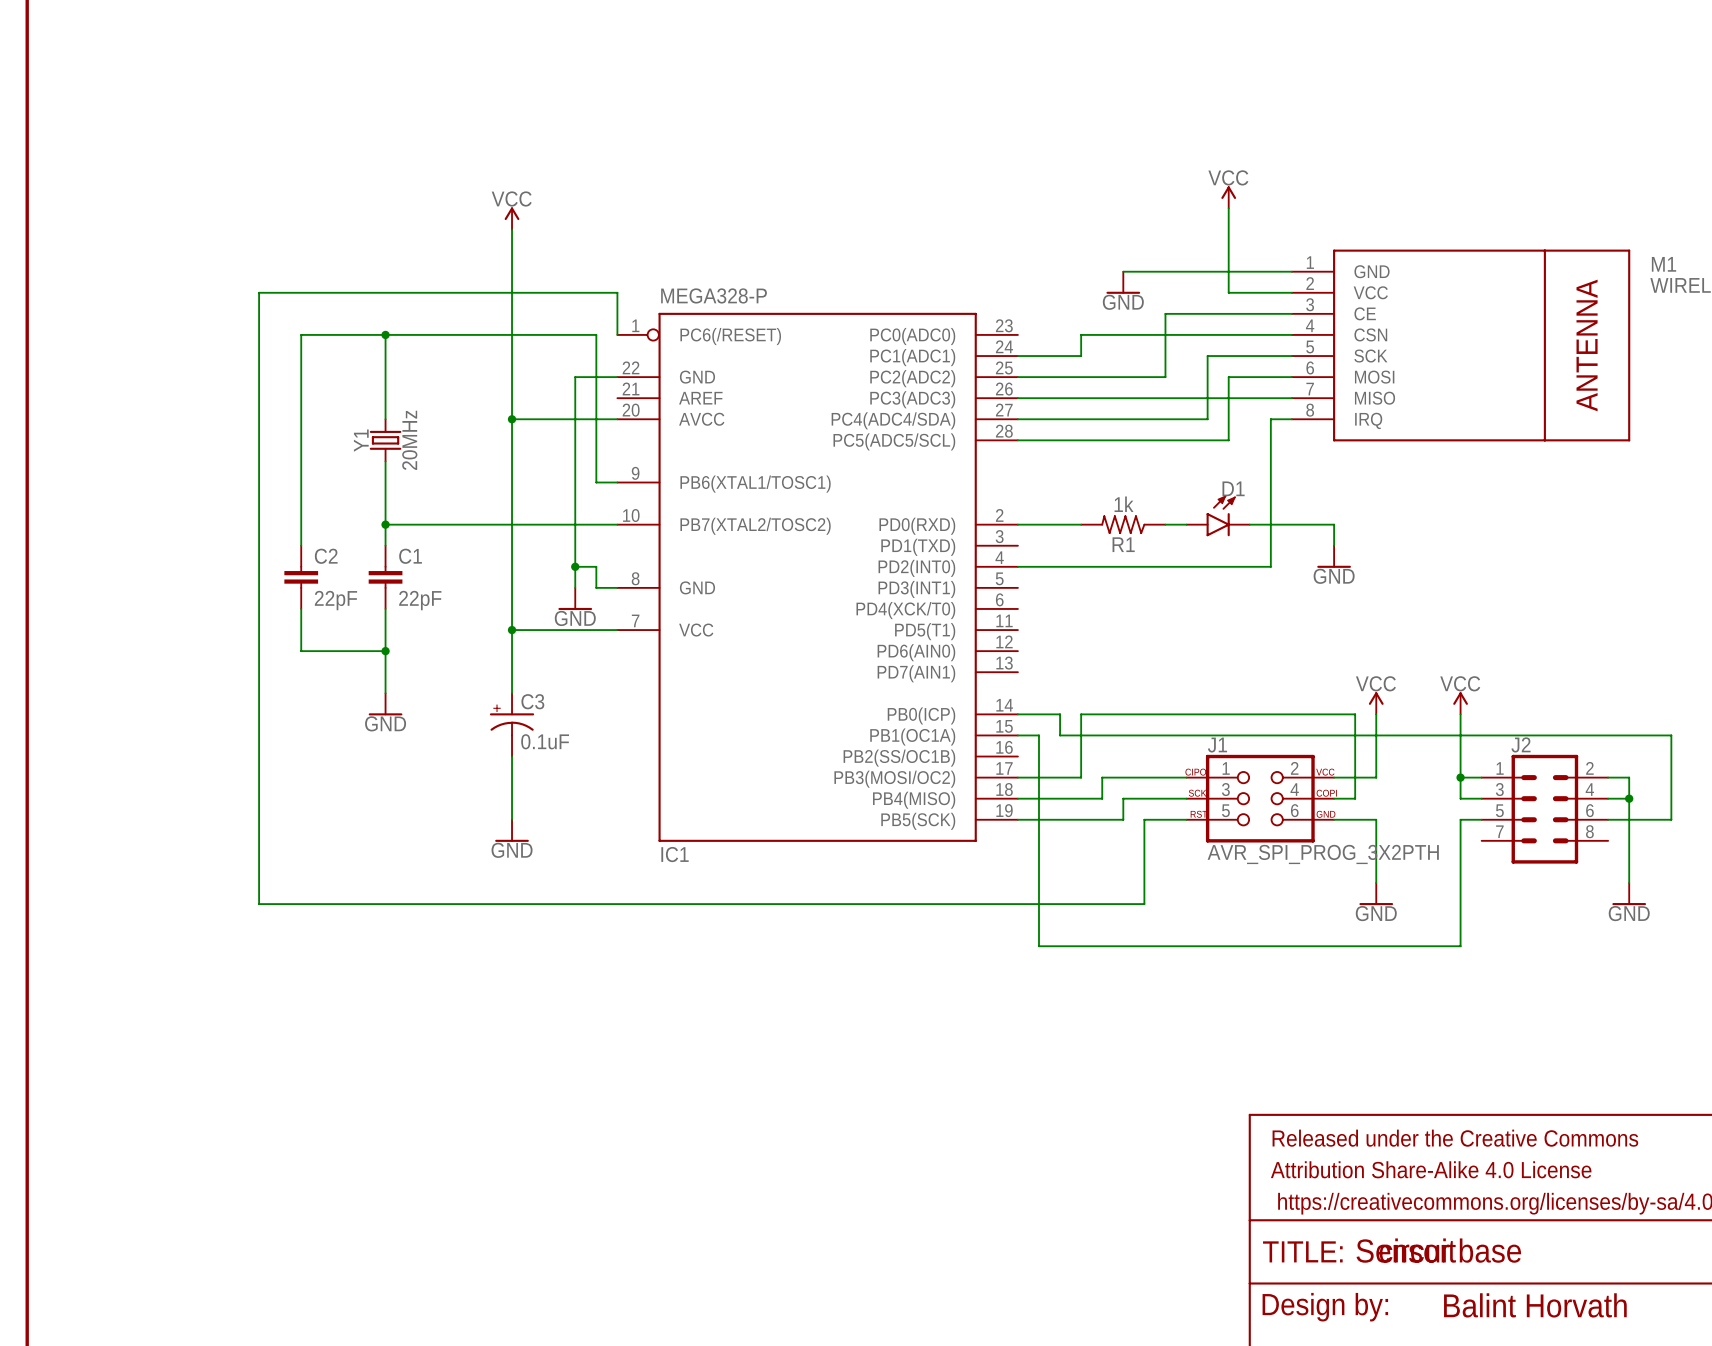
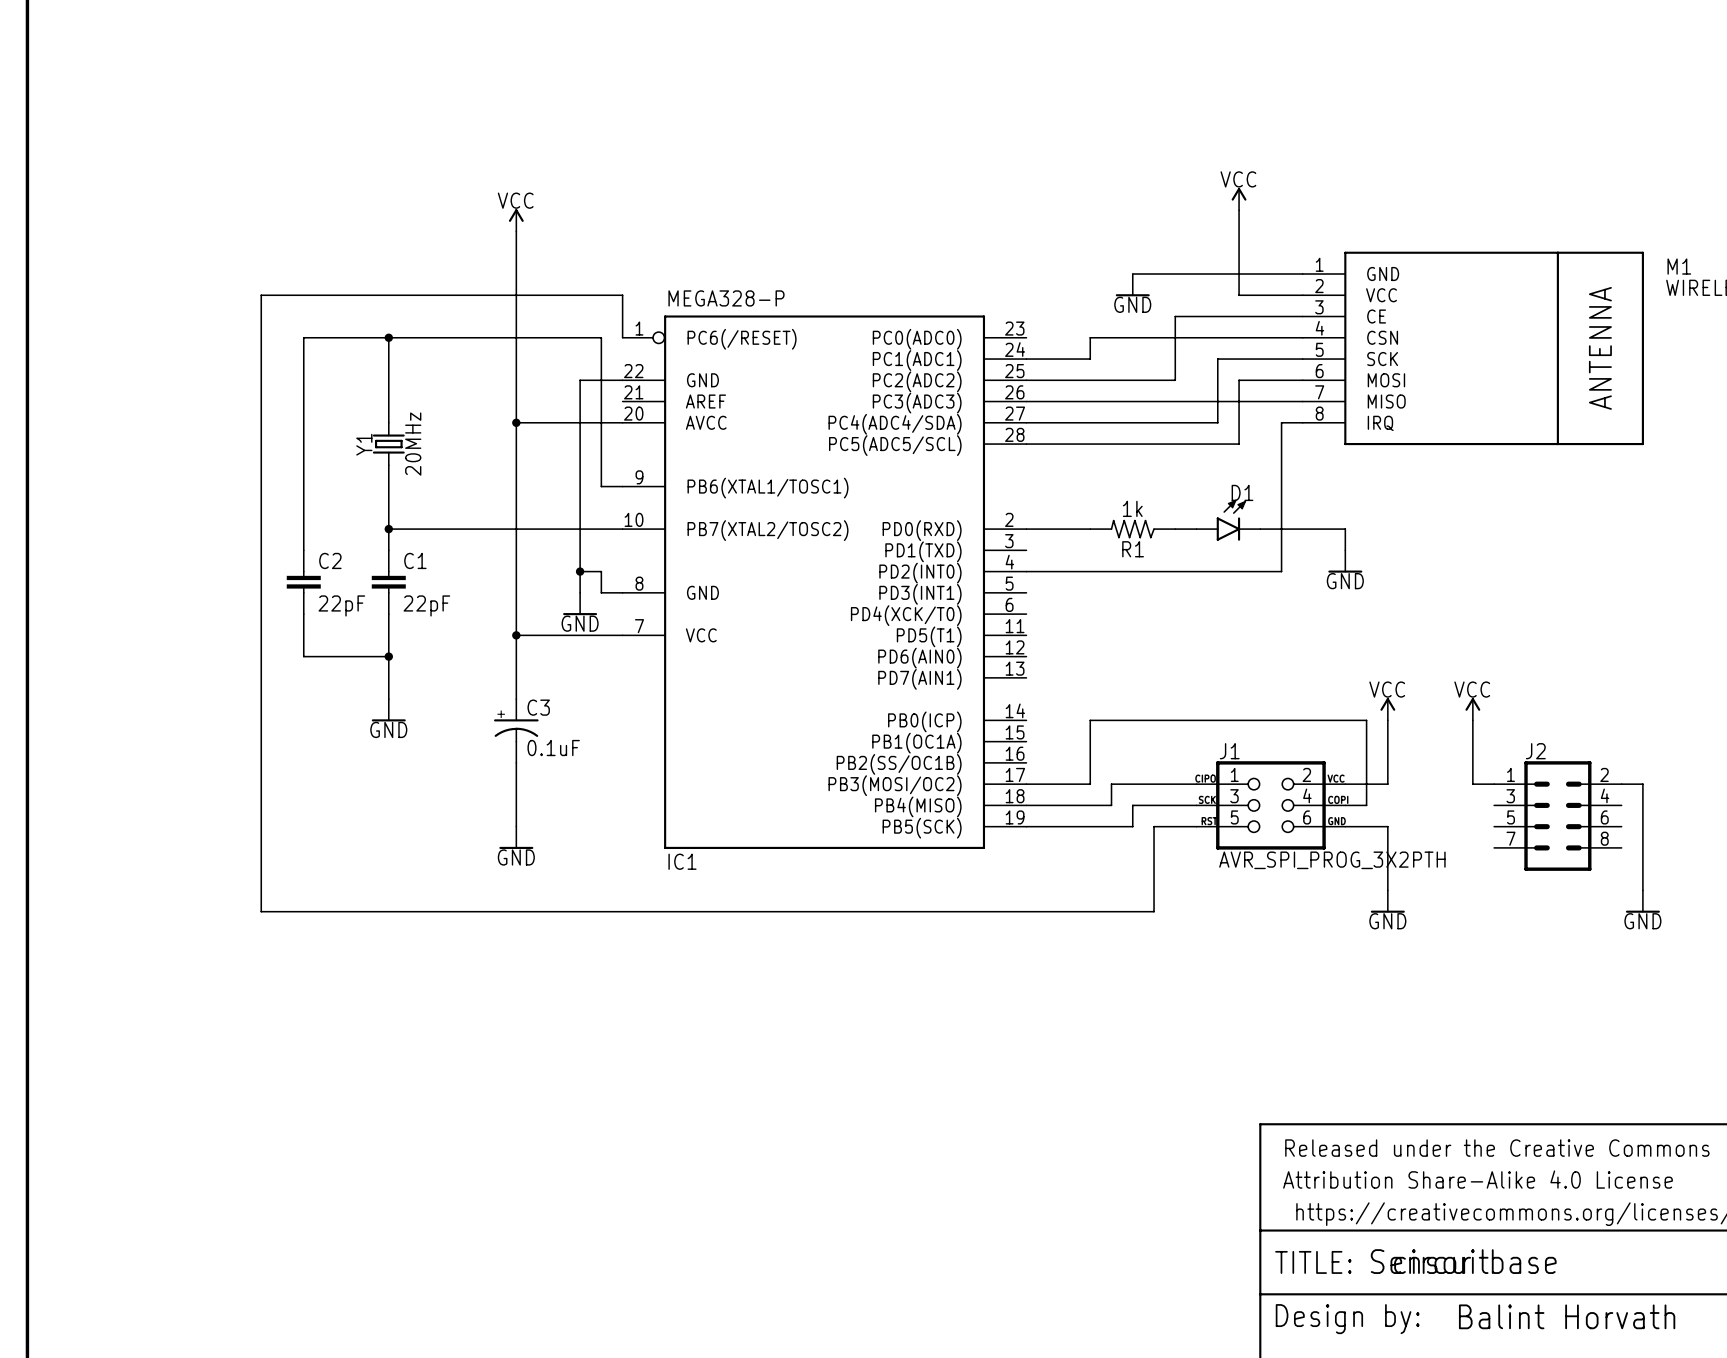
wire: (1017, 714) (1060, 714) (1060, 735) (1671, 735) (1671, 819) (1608, 819) -> none
wire: (1017, 735) (1038, 735) (1038, 946) (1460, 946) (1460, 819) (1481, 819) -> none
wire: (1460, 777) (1460, 798) (1481, 798) -> none
junction: (1460, 777) -> none
wire: (1608, 798) (1629, 798) -> none
junction: (1629, 798) -> none

